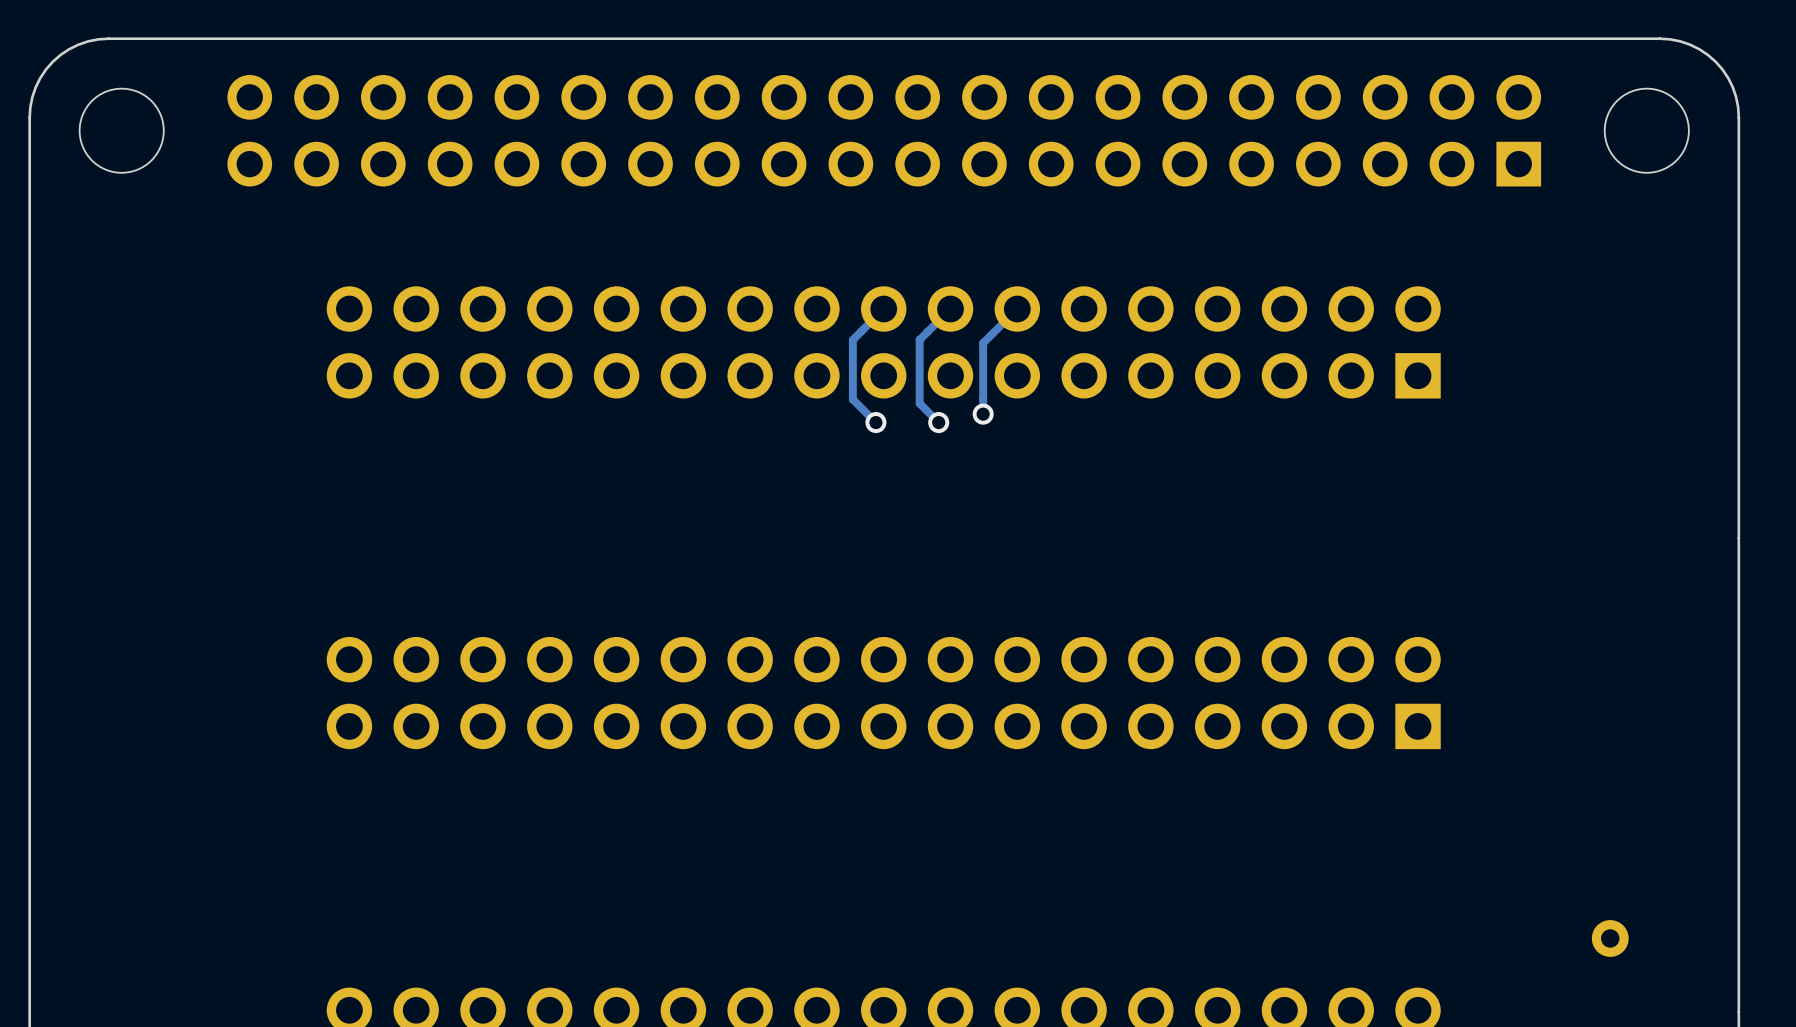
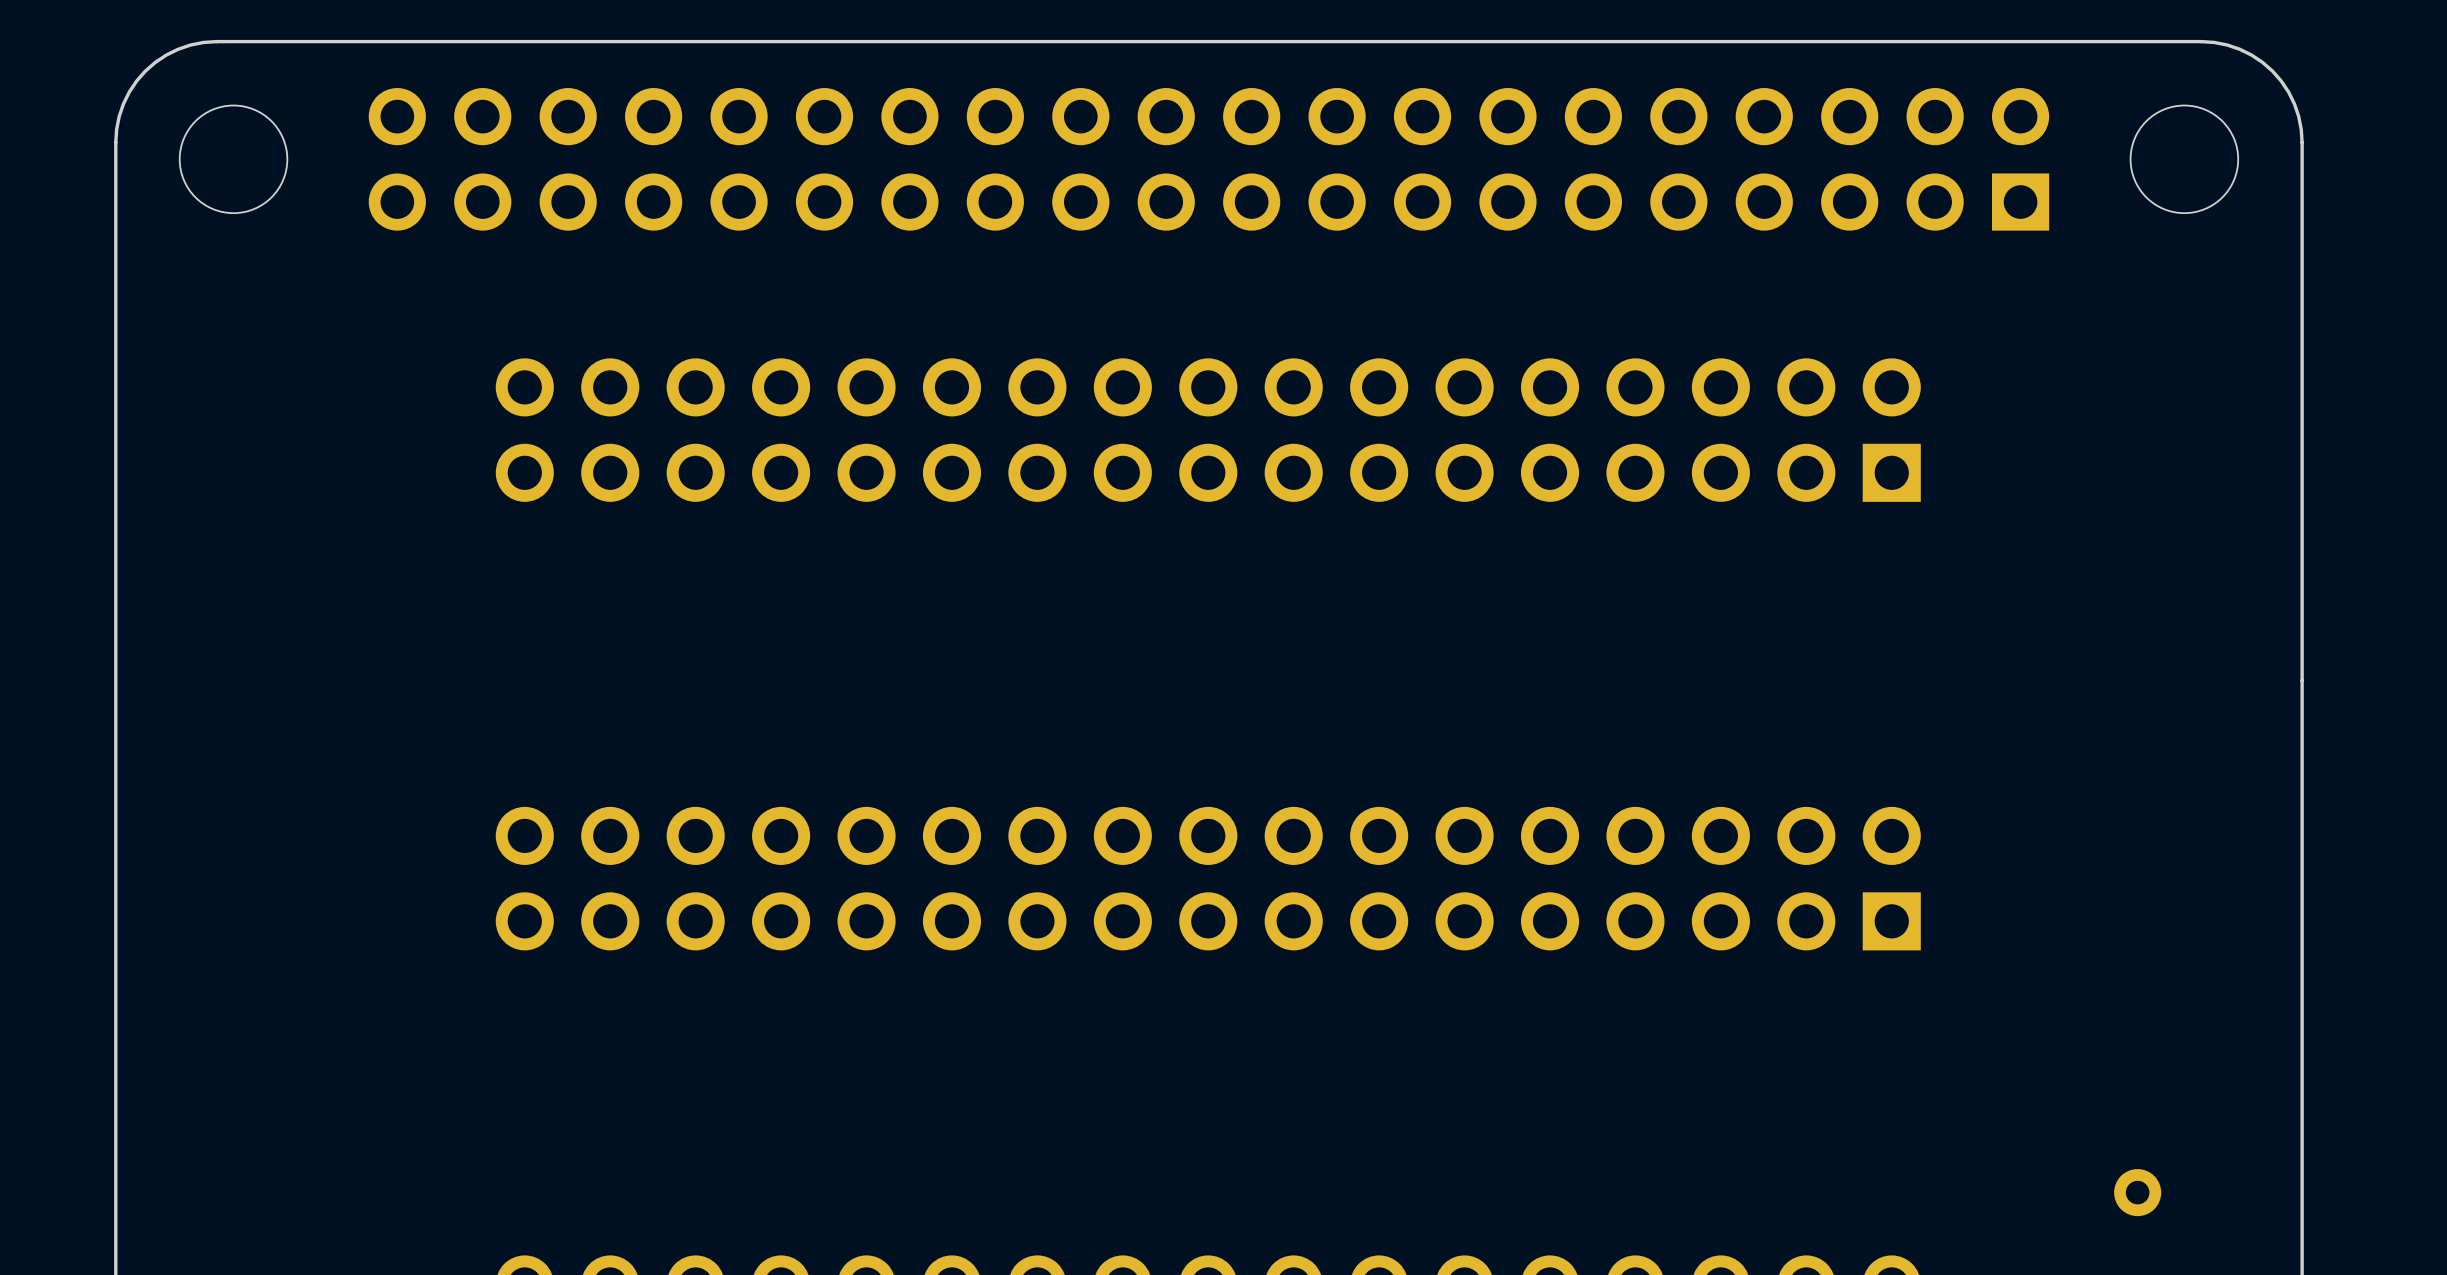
track: (883, 309) (852, 339) (852, 399) (875, 422) -> none
track: (950, 309) (919, 339) (919, 403) (938, 422) -> none
track: (1017, 309) (983, 343) (983, 414) -> none
via: (983, 414) -> none
via: (875, 422) -> none
via: (938, 422) -> none

